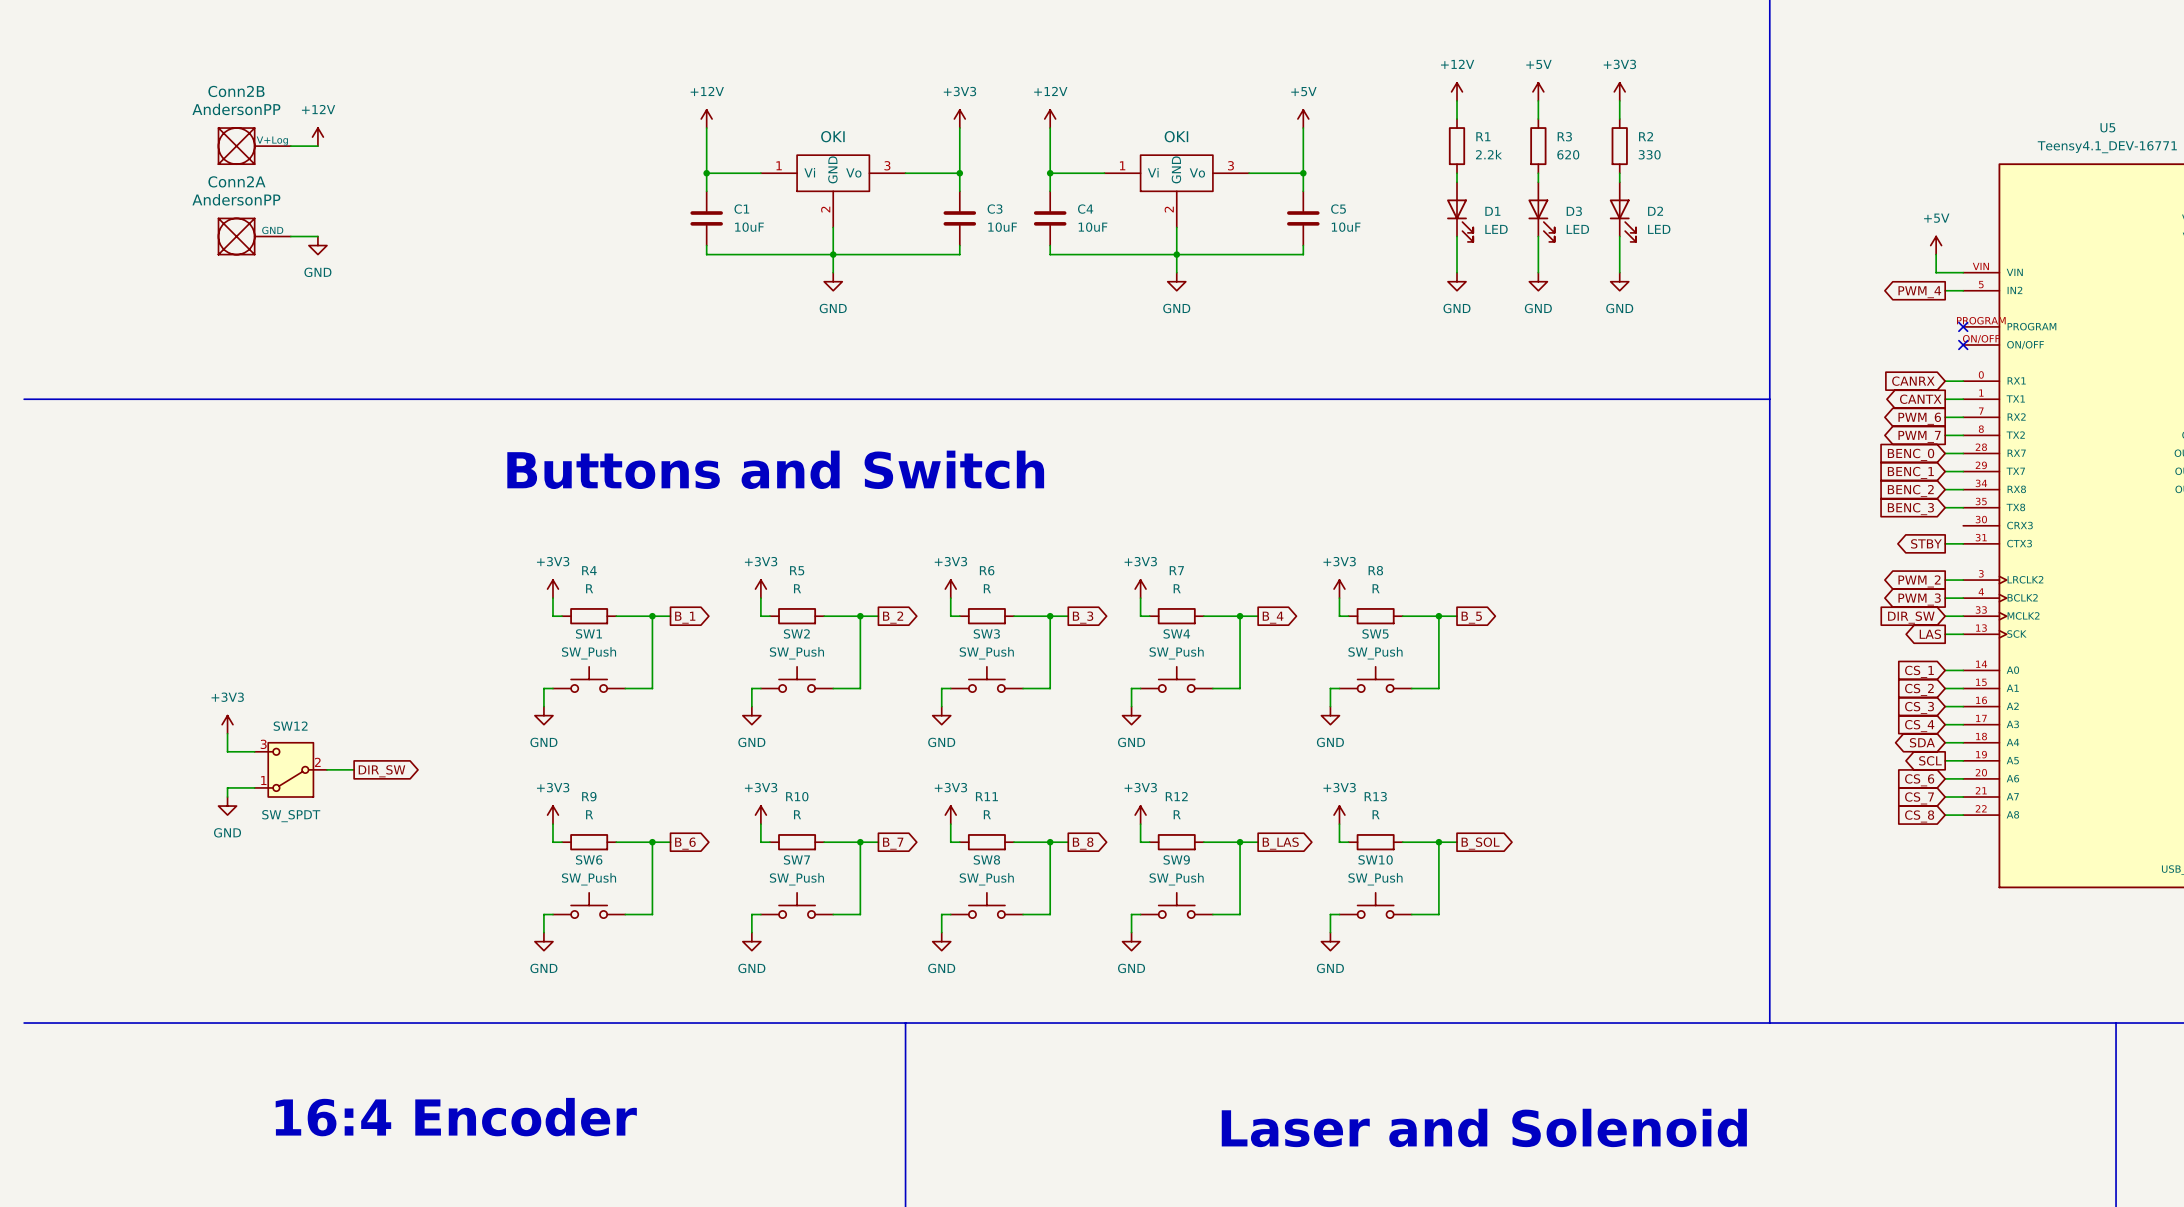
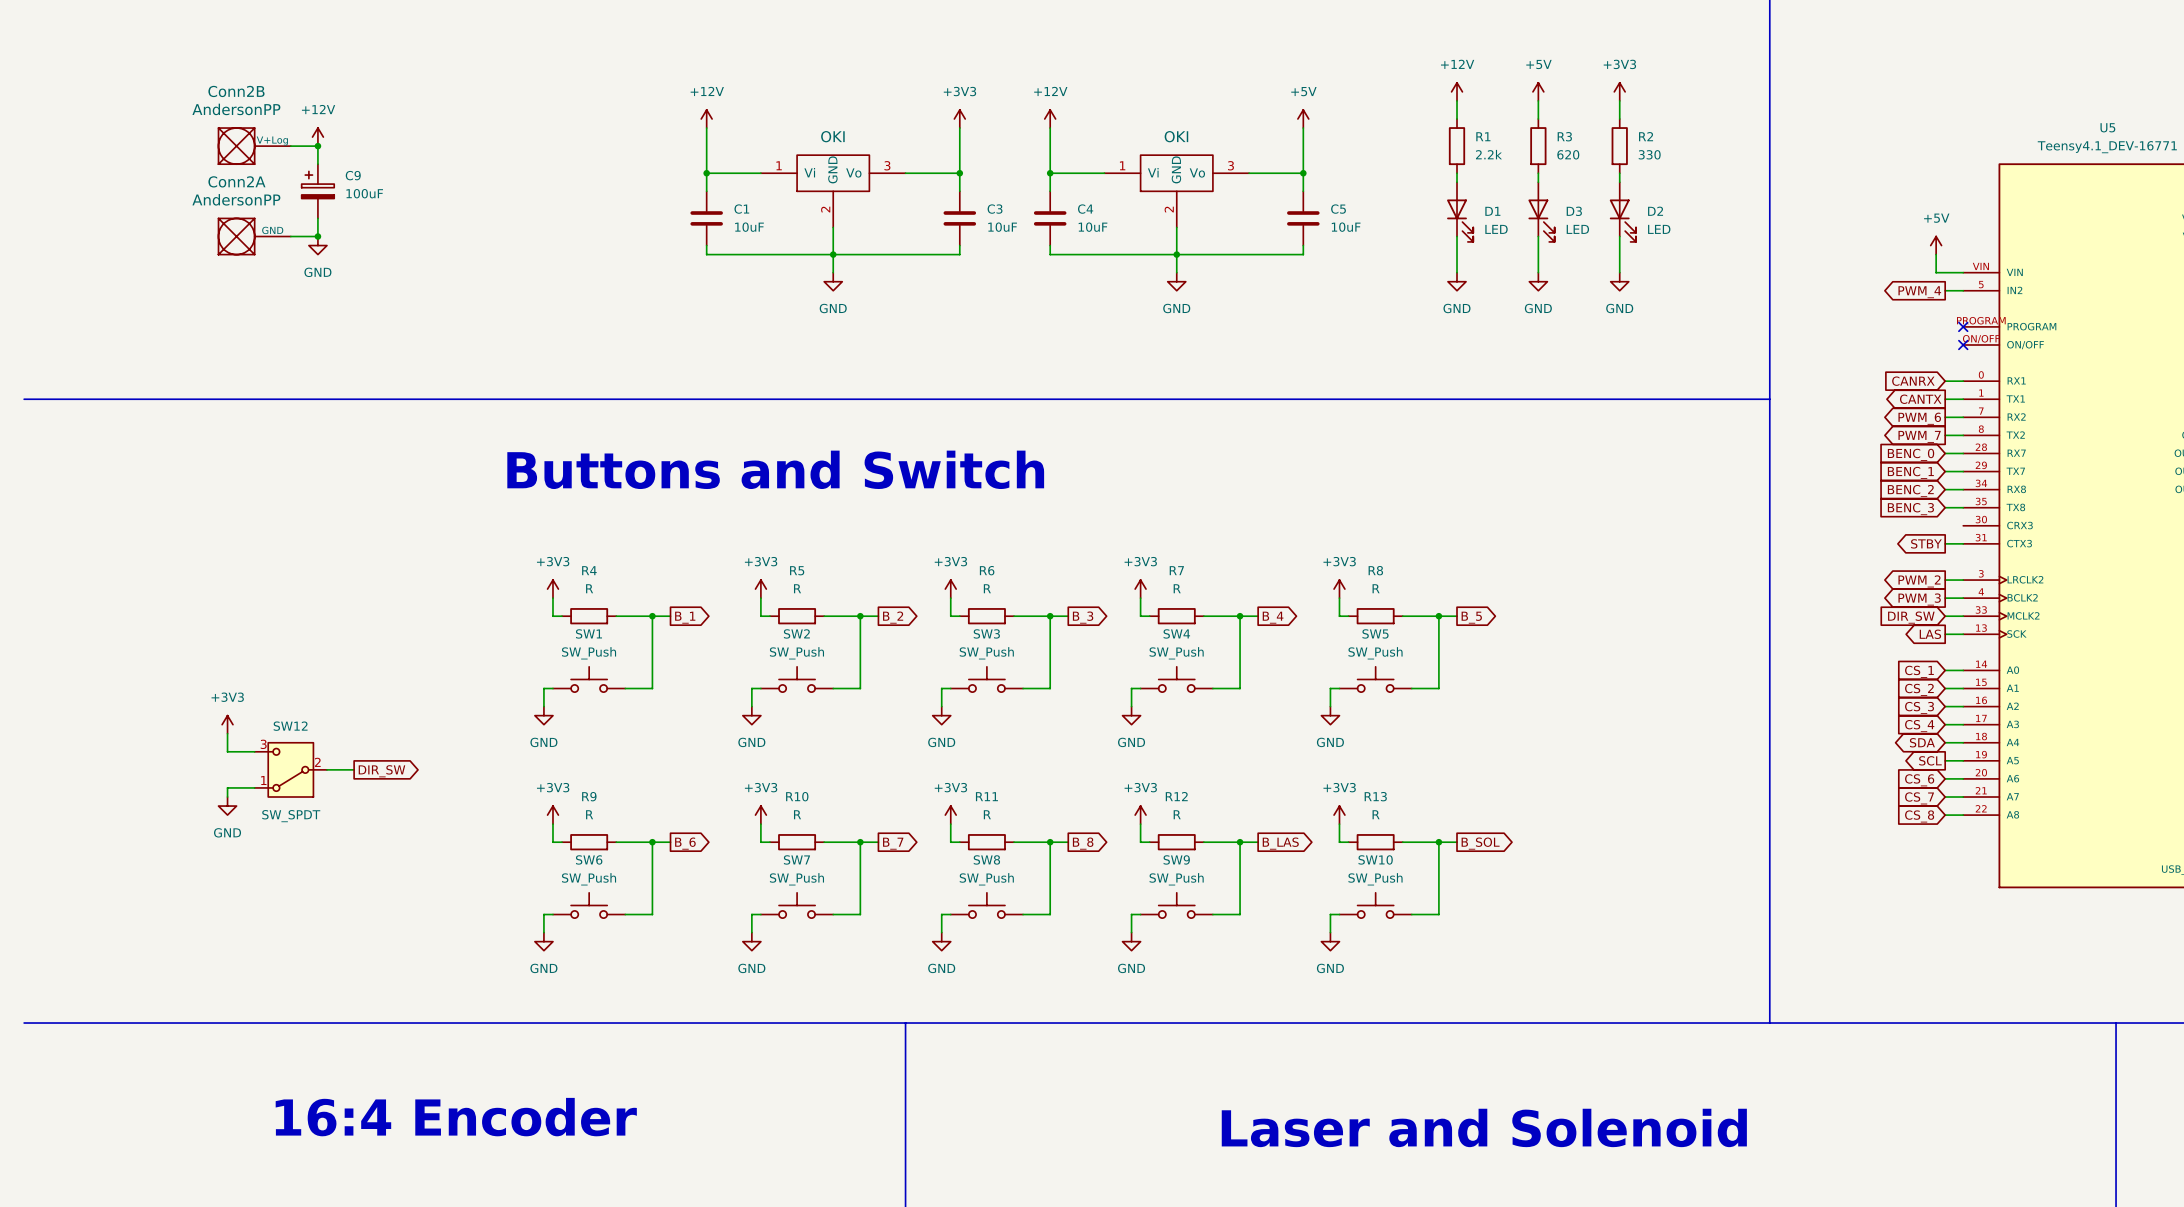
wire: none -> (317, 146) (317, 164)
junction: none -> (317, 146)
C9: none -> 100uF (317, 191)
wire: none -> (317, 218) (317, 236)
junction: none -> (317, 236)

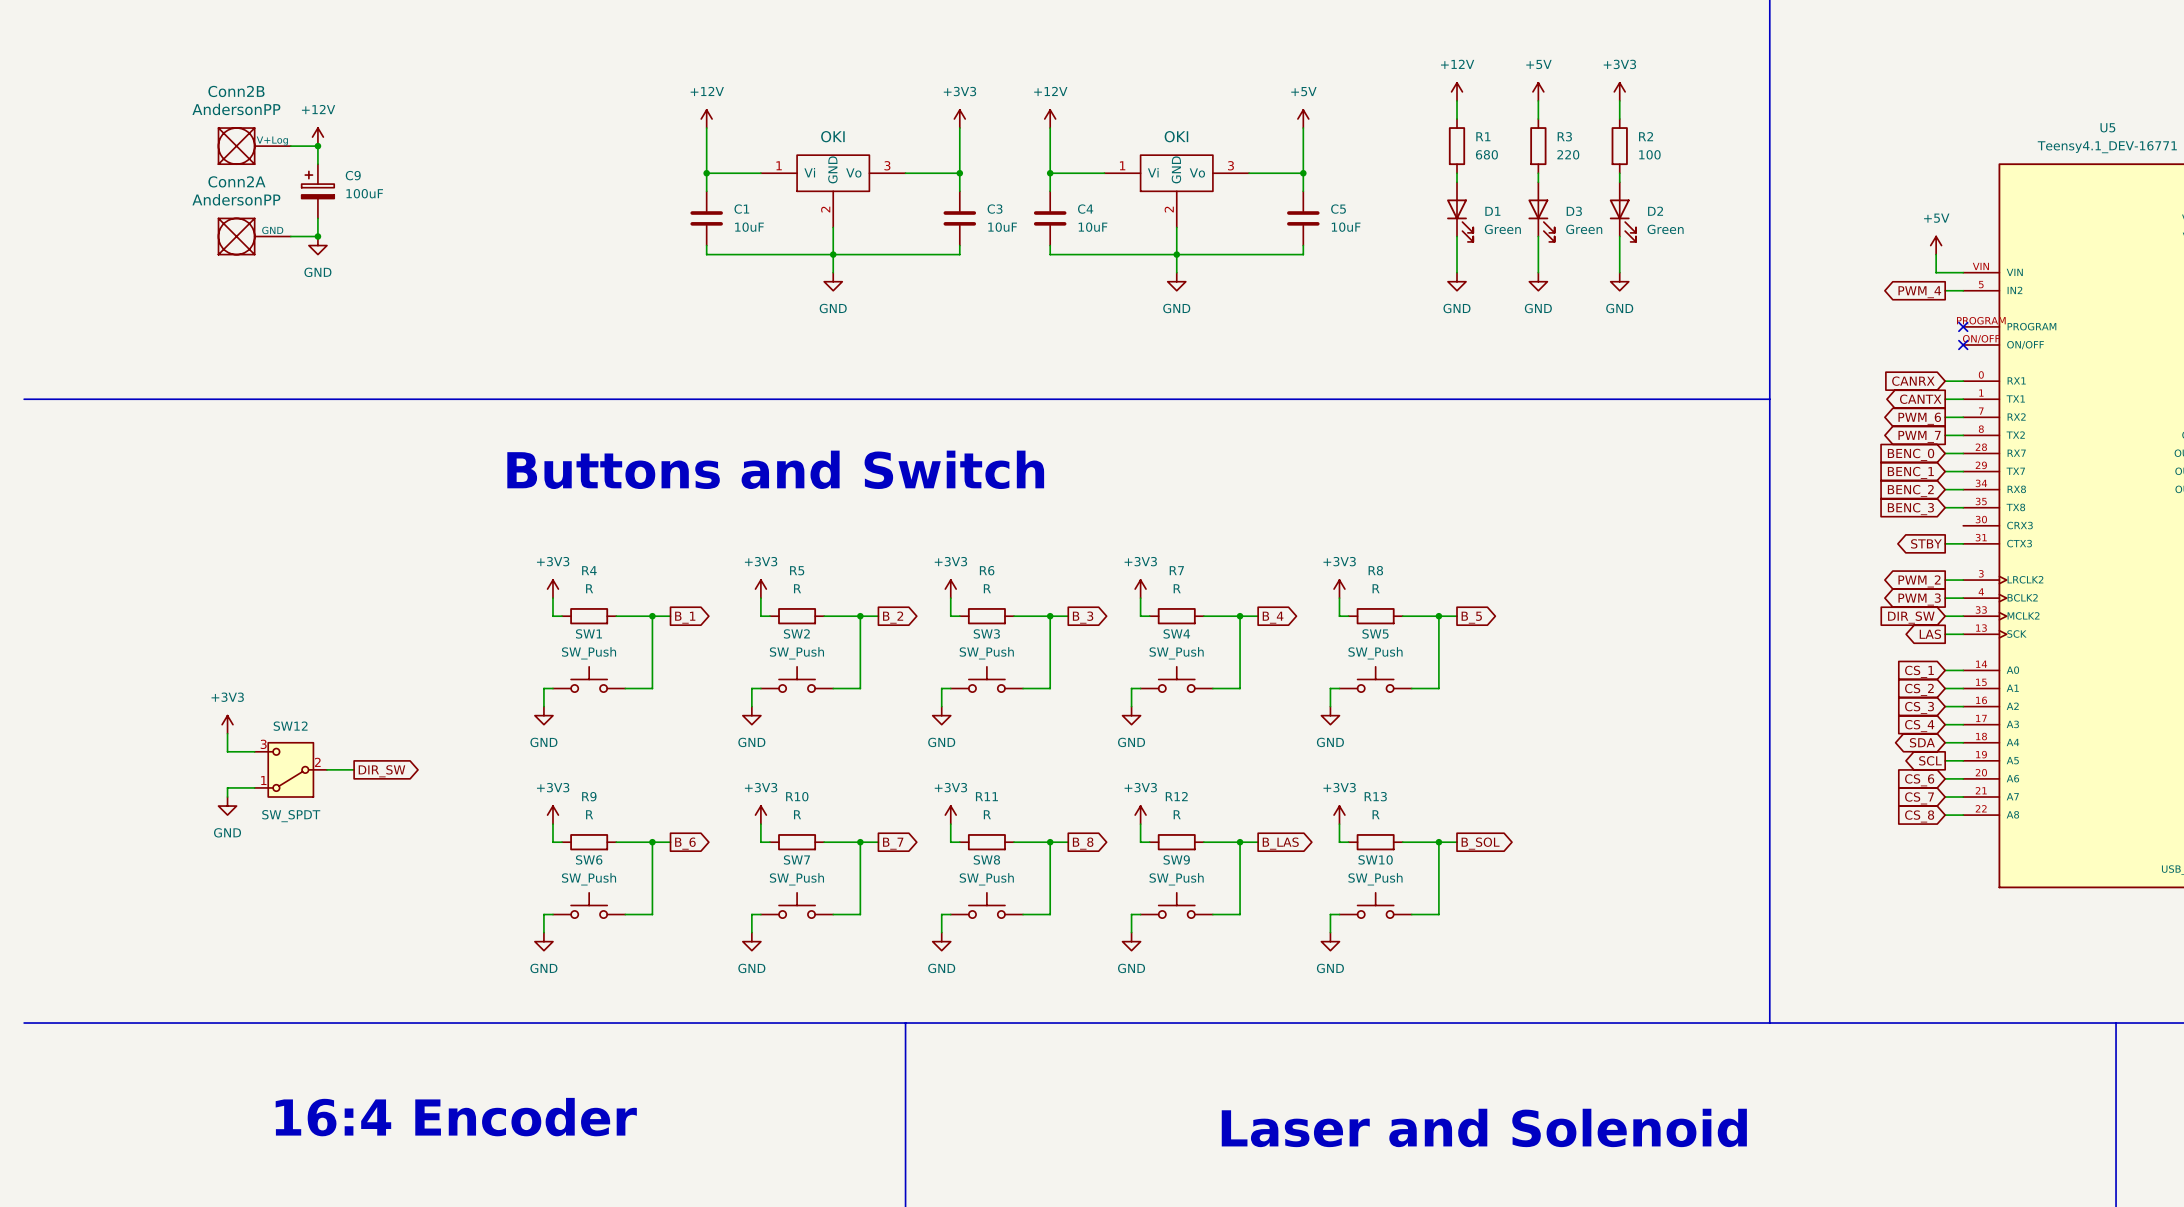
R1 value: 2.2k (1488, 154) -> 680 (1486, 154)
R3 value: 620 (1568, 154) -> 220 (1568, 154)
R2 value: 330 (1649, 154) -> 100 (1649, 154)
D1 value: LED (1496, 229) -> Green (1502, 229)
D3 value: LED (1577, 229) -> Green (1584, 229)
D2 value: LED (1659, 229) -> Green (1665, 229)

